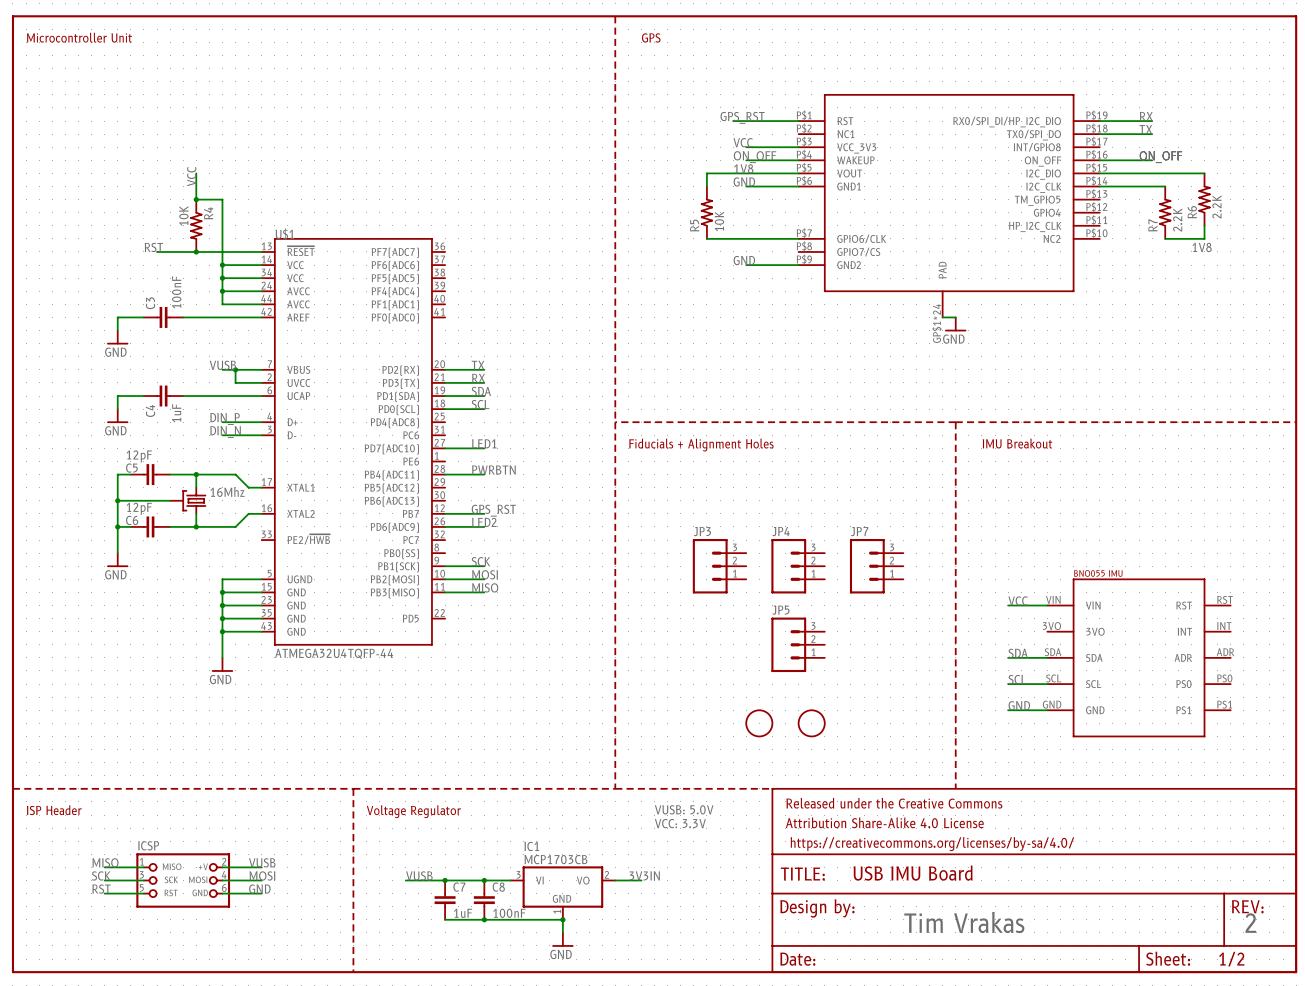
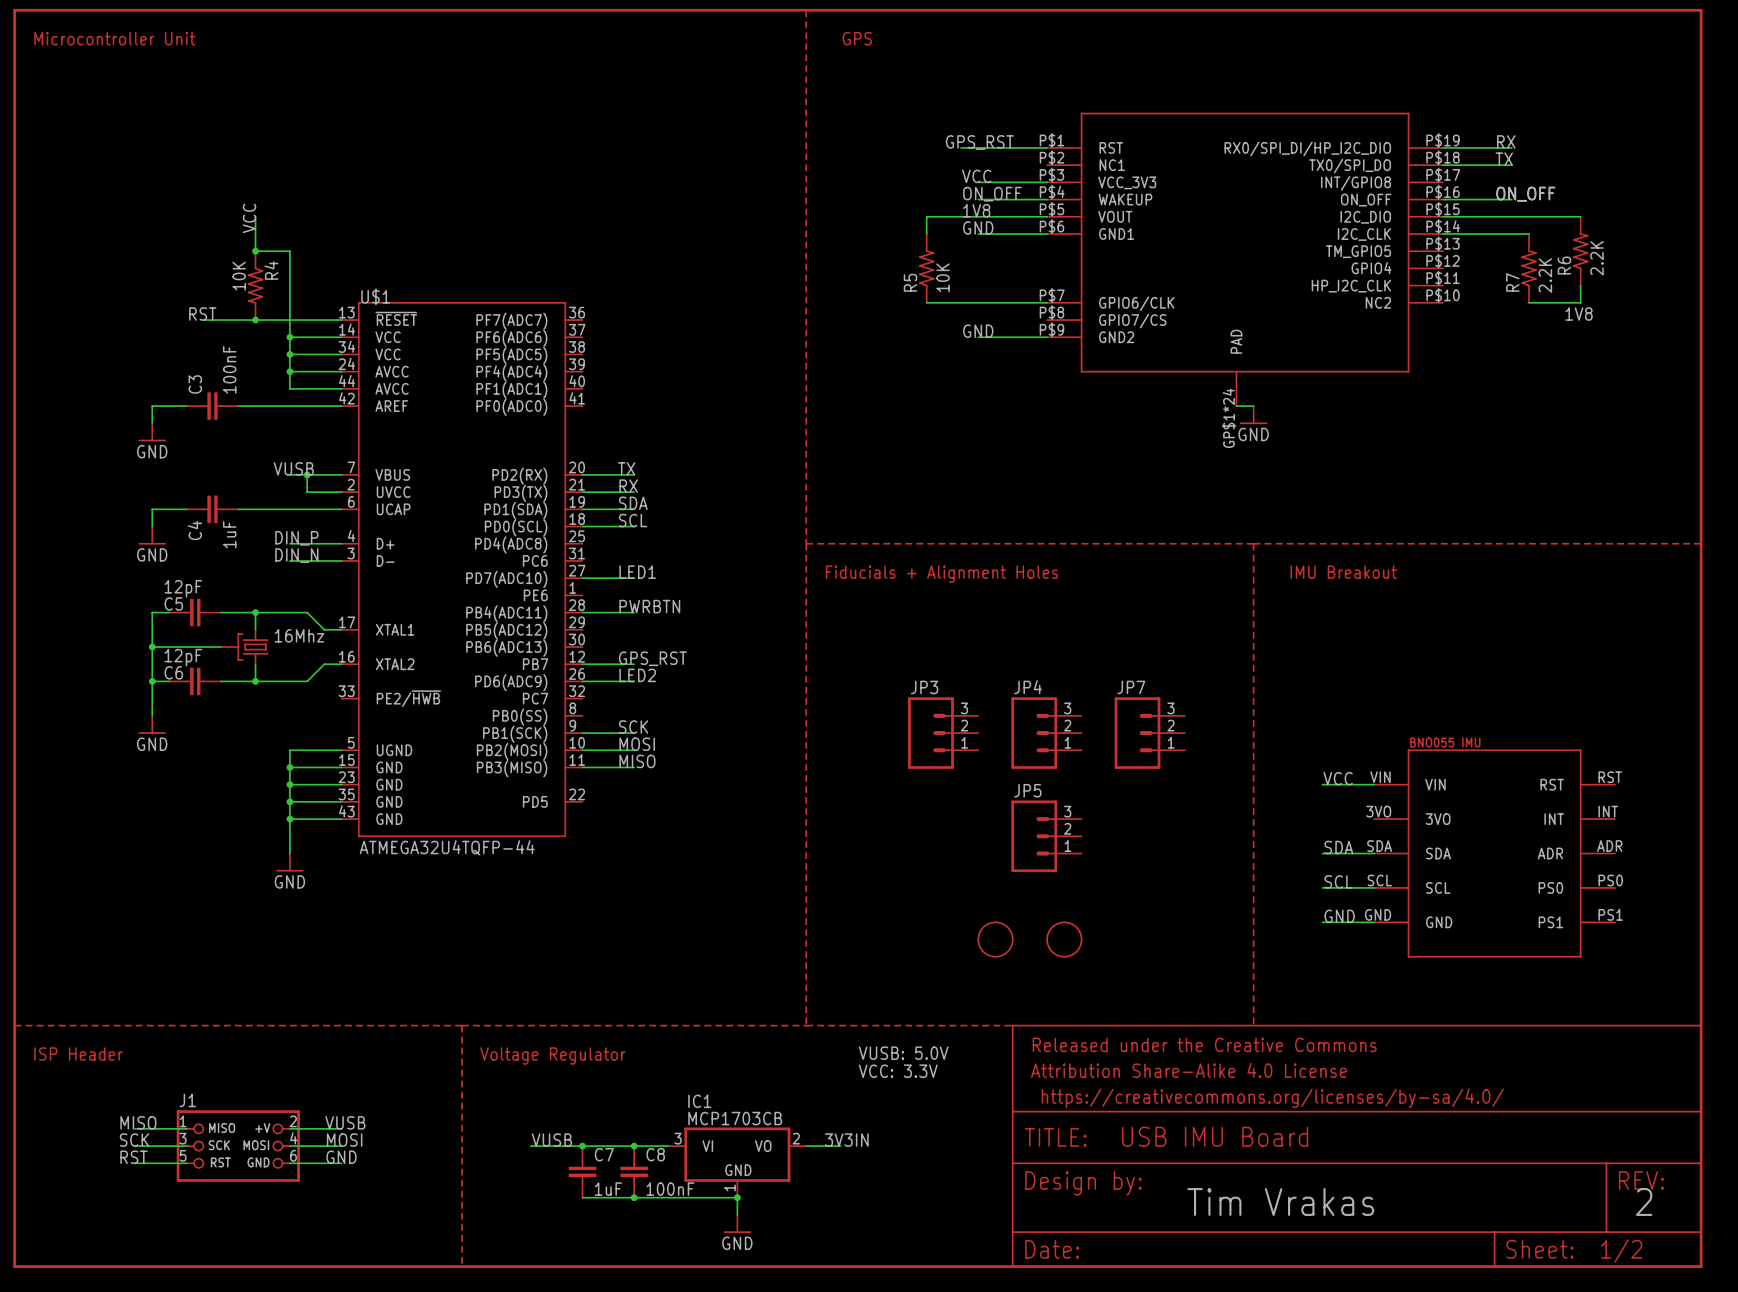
ICSP name: ICSP (148, 845) -> J1 (187, 1100)

